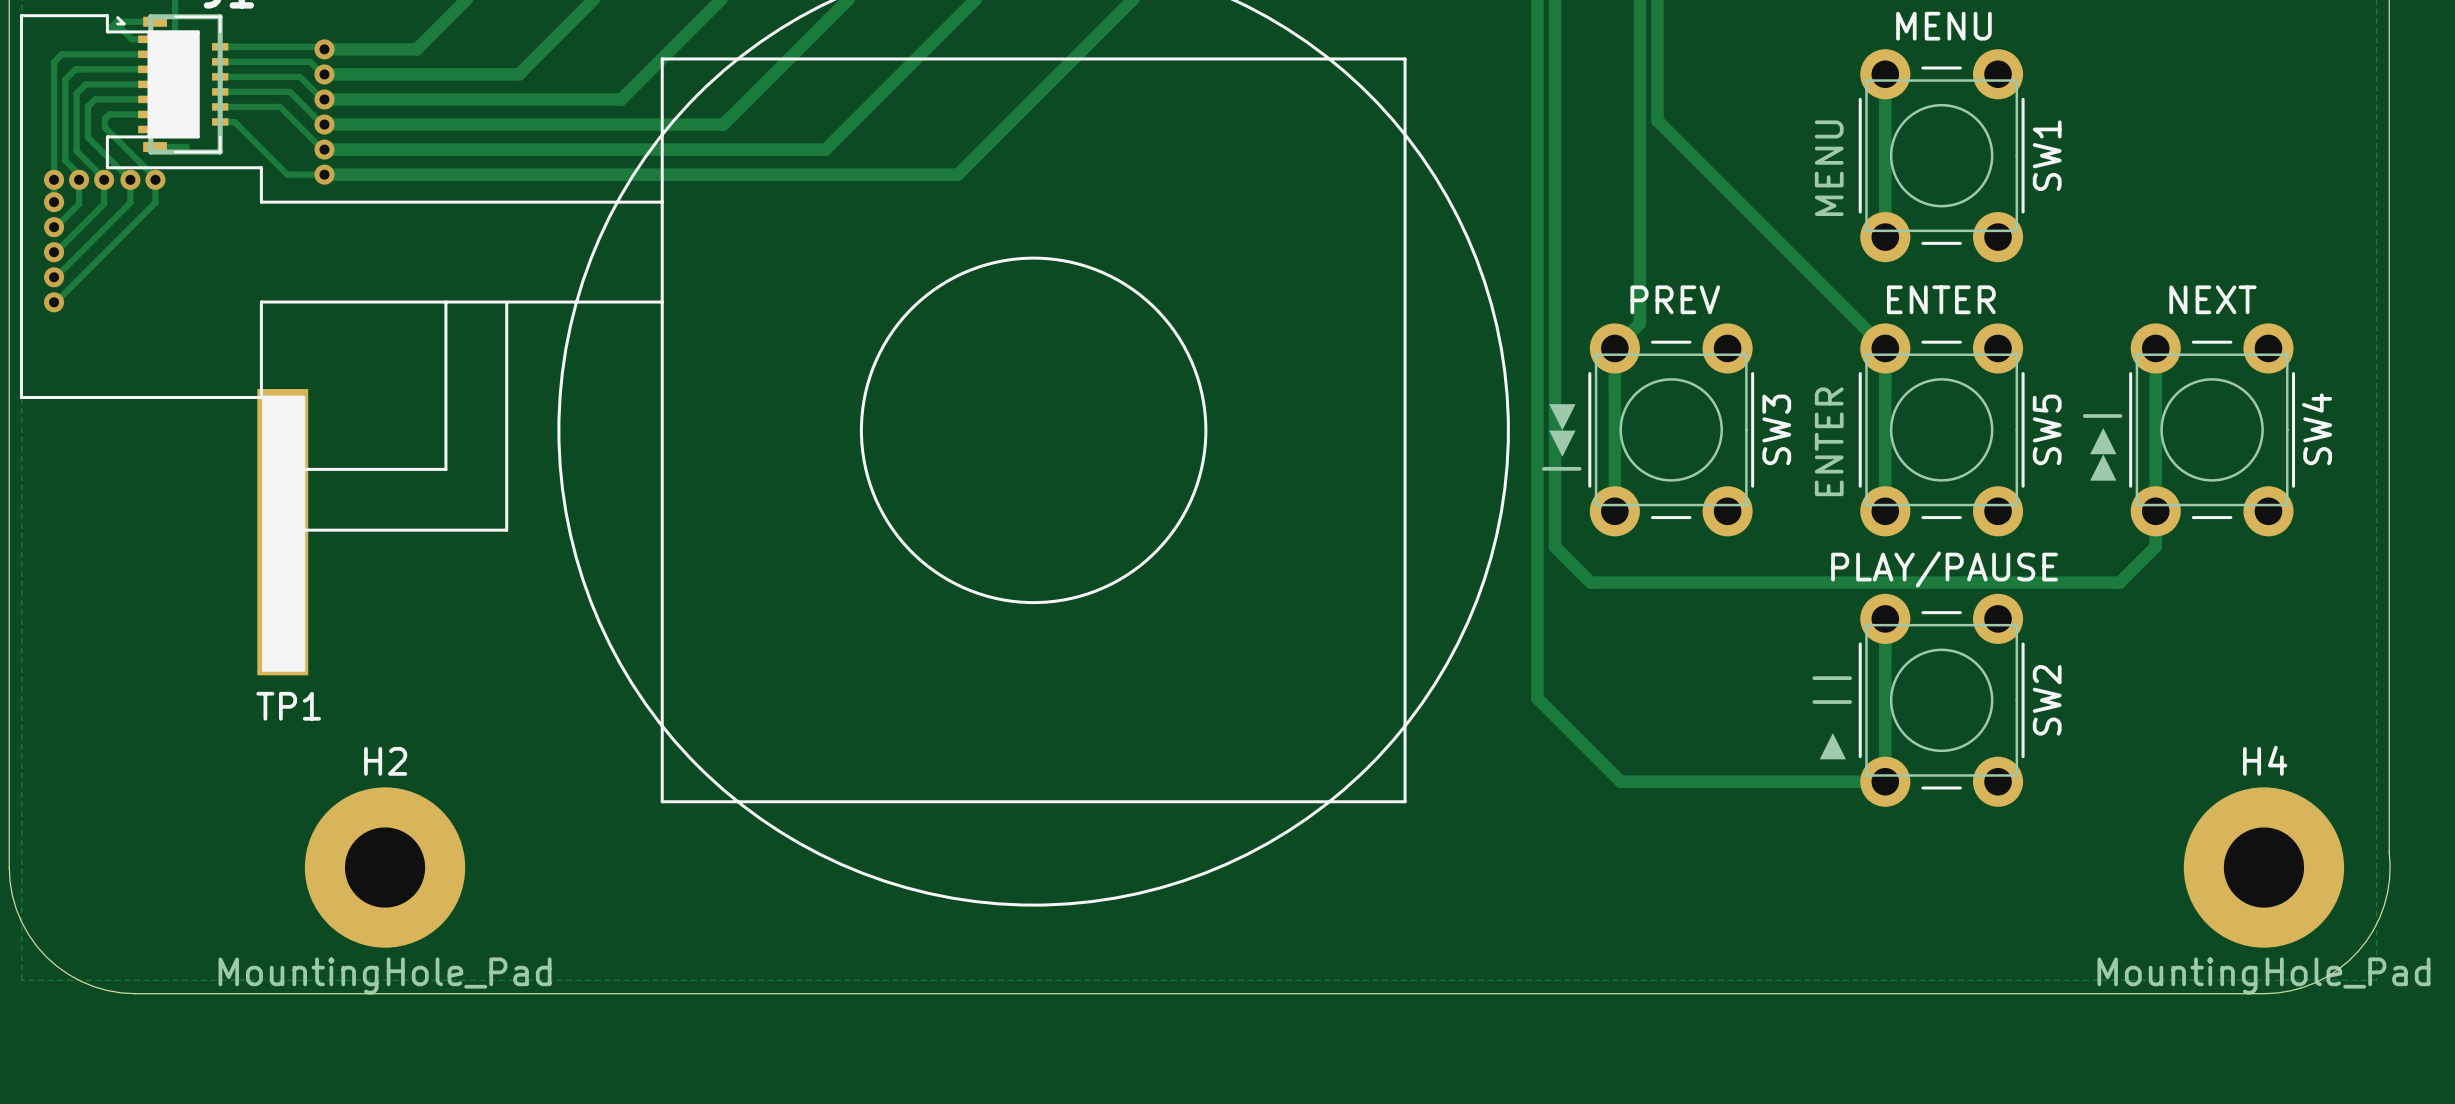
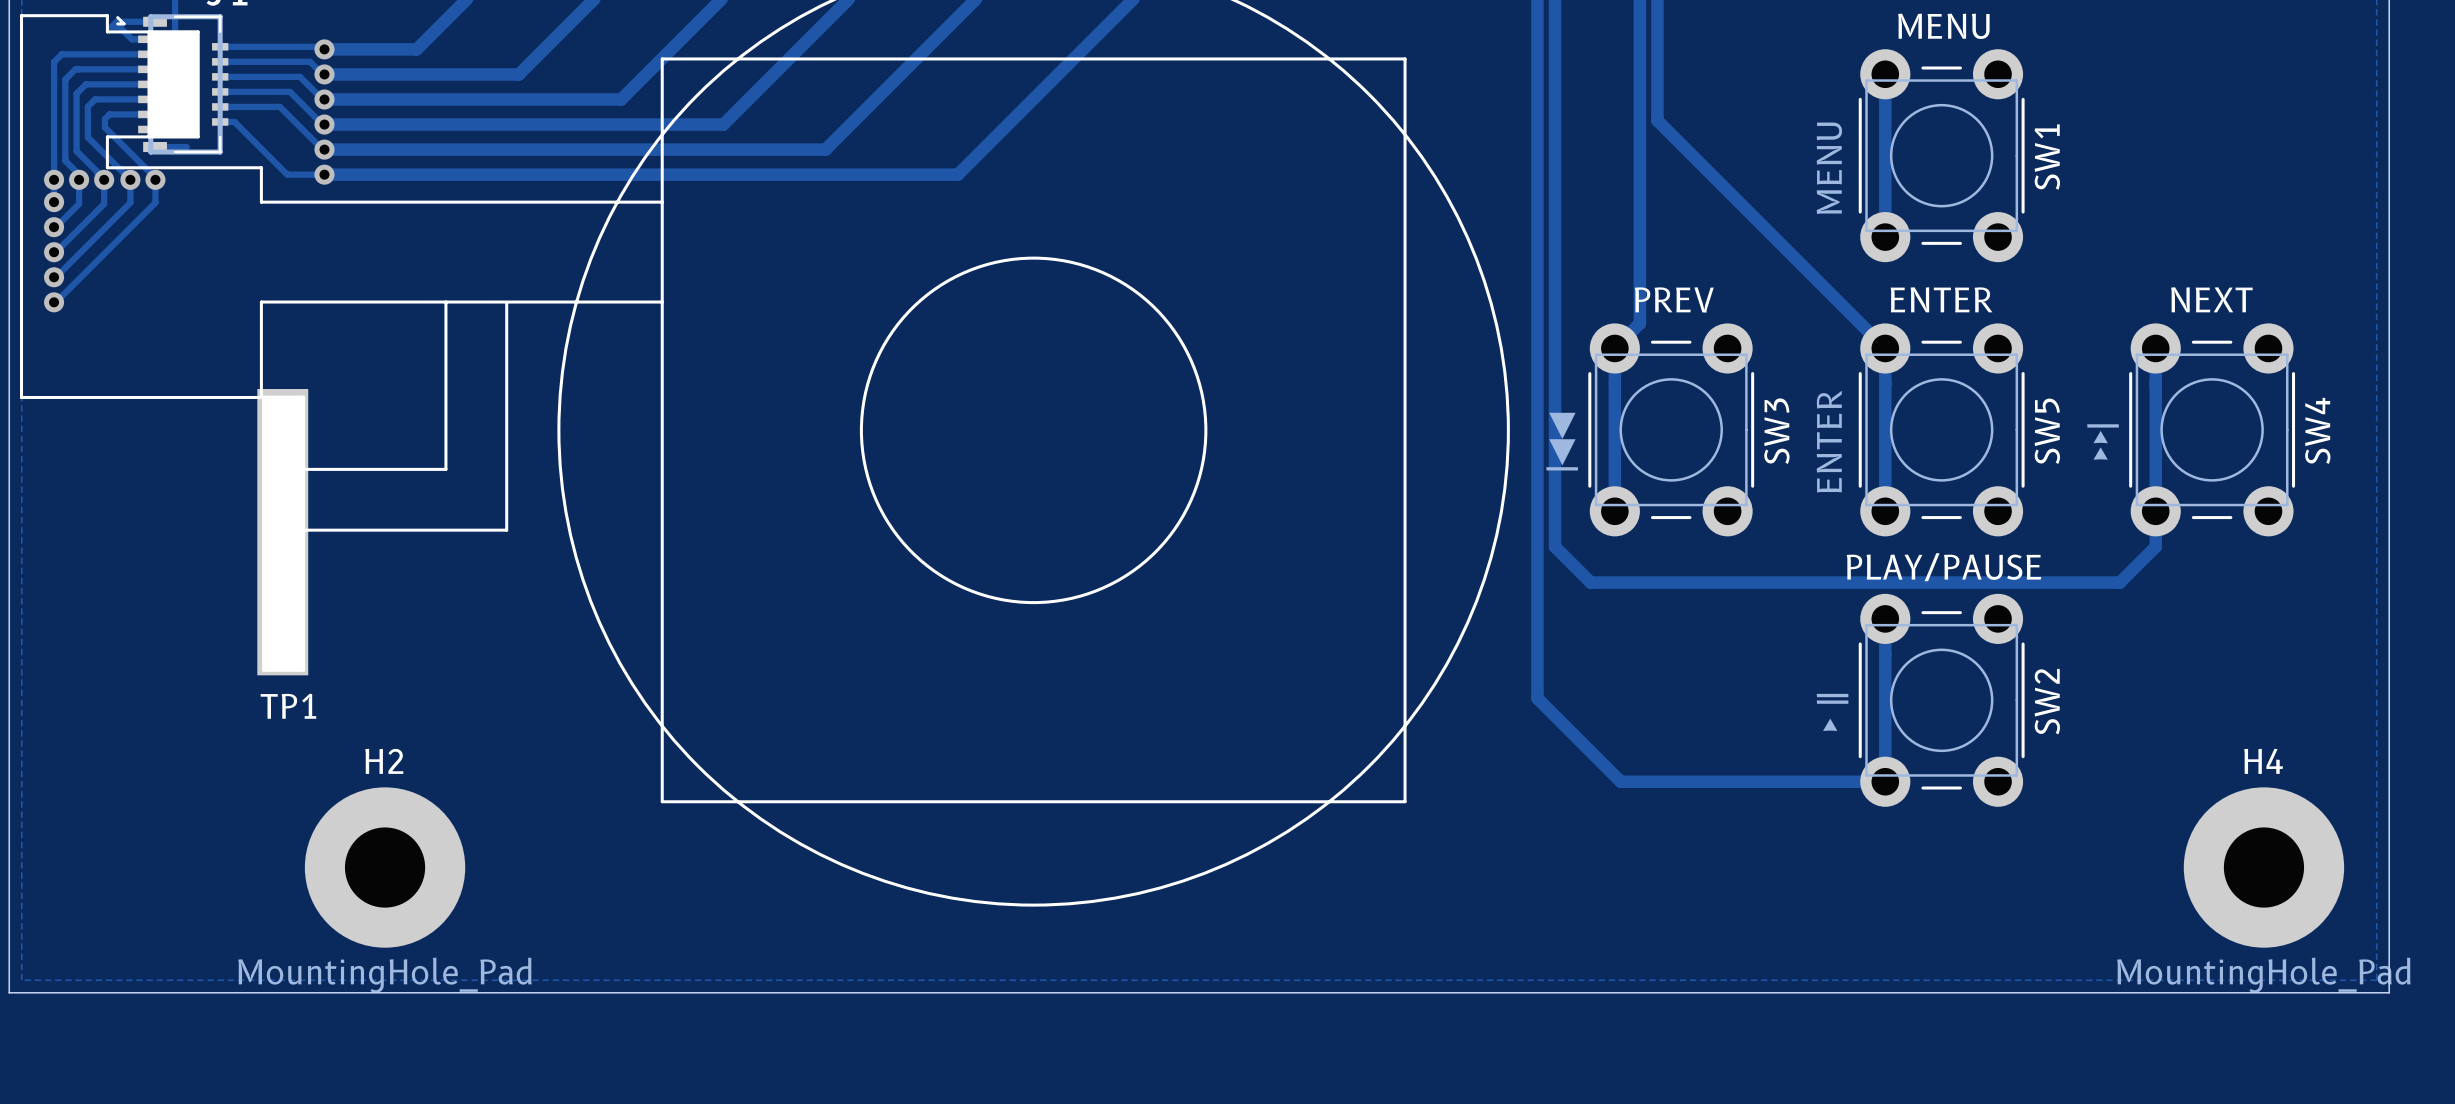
board edge: (2389, 852) (2389, 879) (2384, 905) (2373, 929) (2358, 951) (2327, 976) (2303, 987) (2277, 992) (135, 993) -> (2389, 852) (2389, 992) (9, 992) (9, 867)
board edge: (9, 867) (12, 895) (21, 922) (28, 934) (46, 956) (68, 974) (93, 986) (107, 990) (135, 993) -> none

